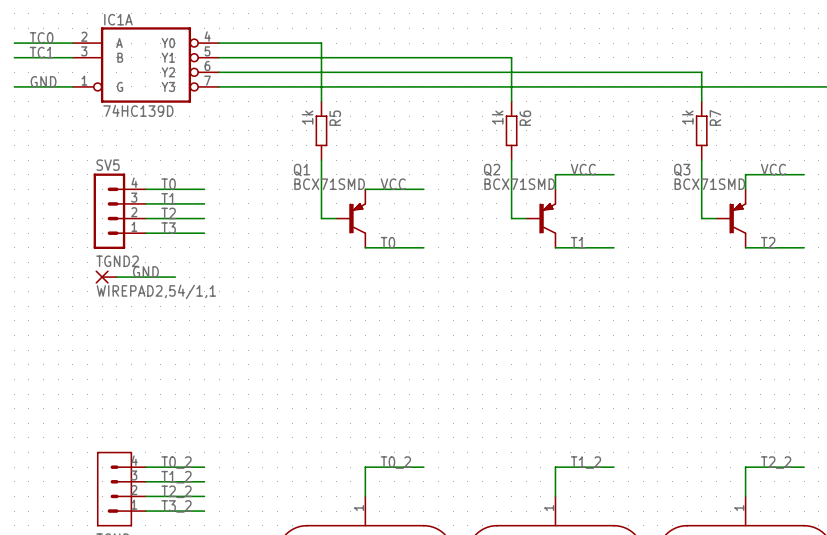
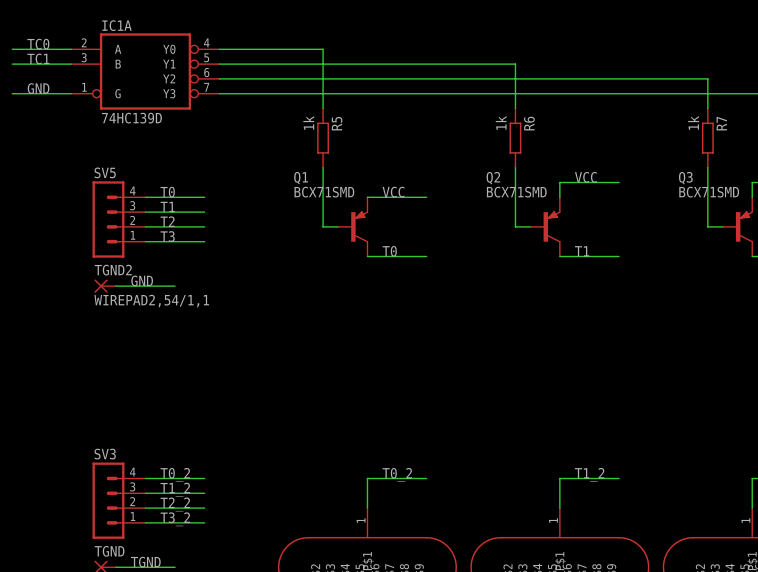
SV3: none -> (118, 500)
part: (121, 489) -> none

